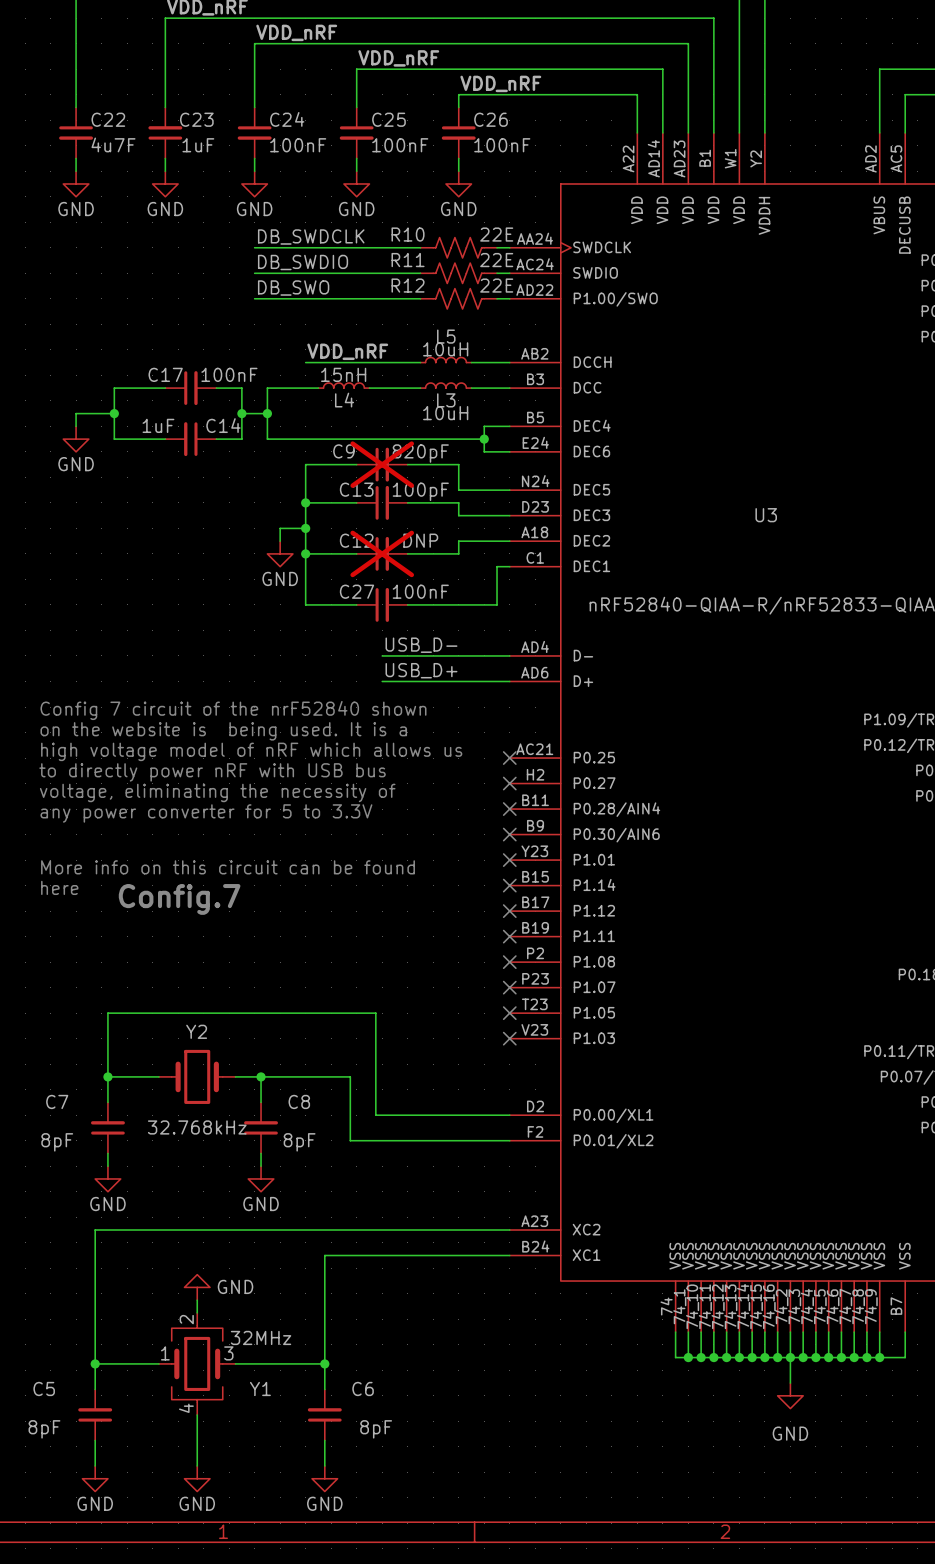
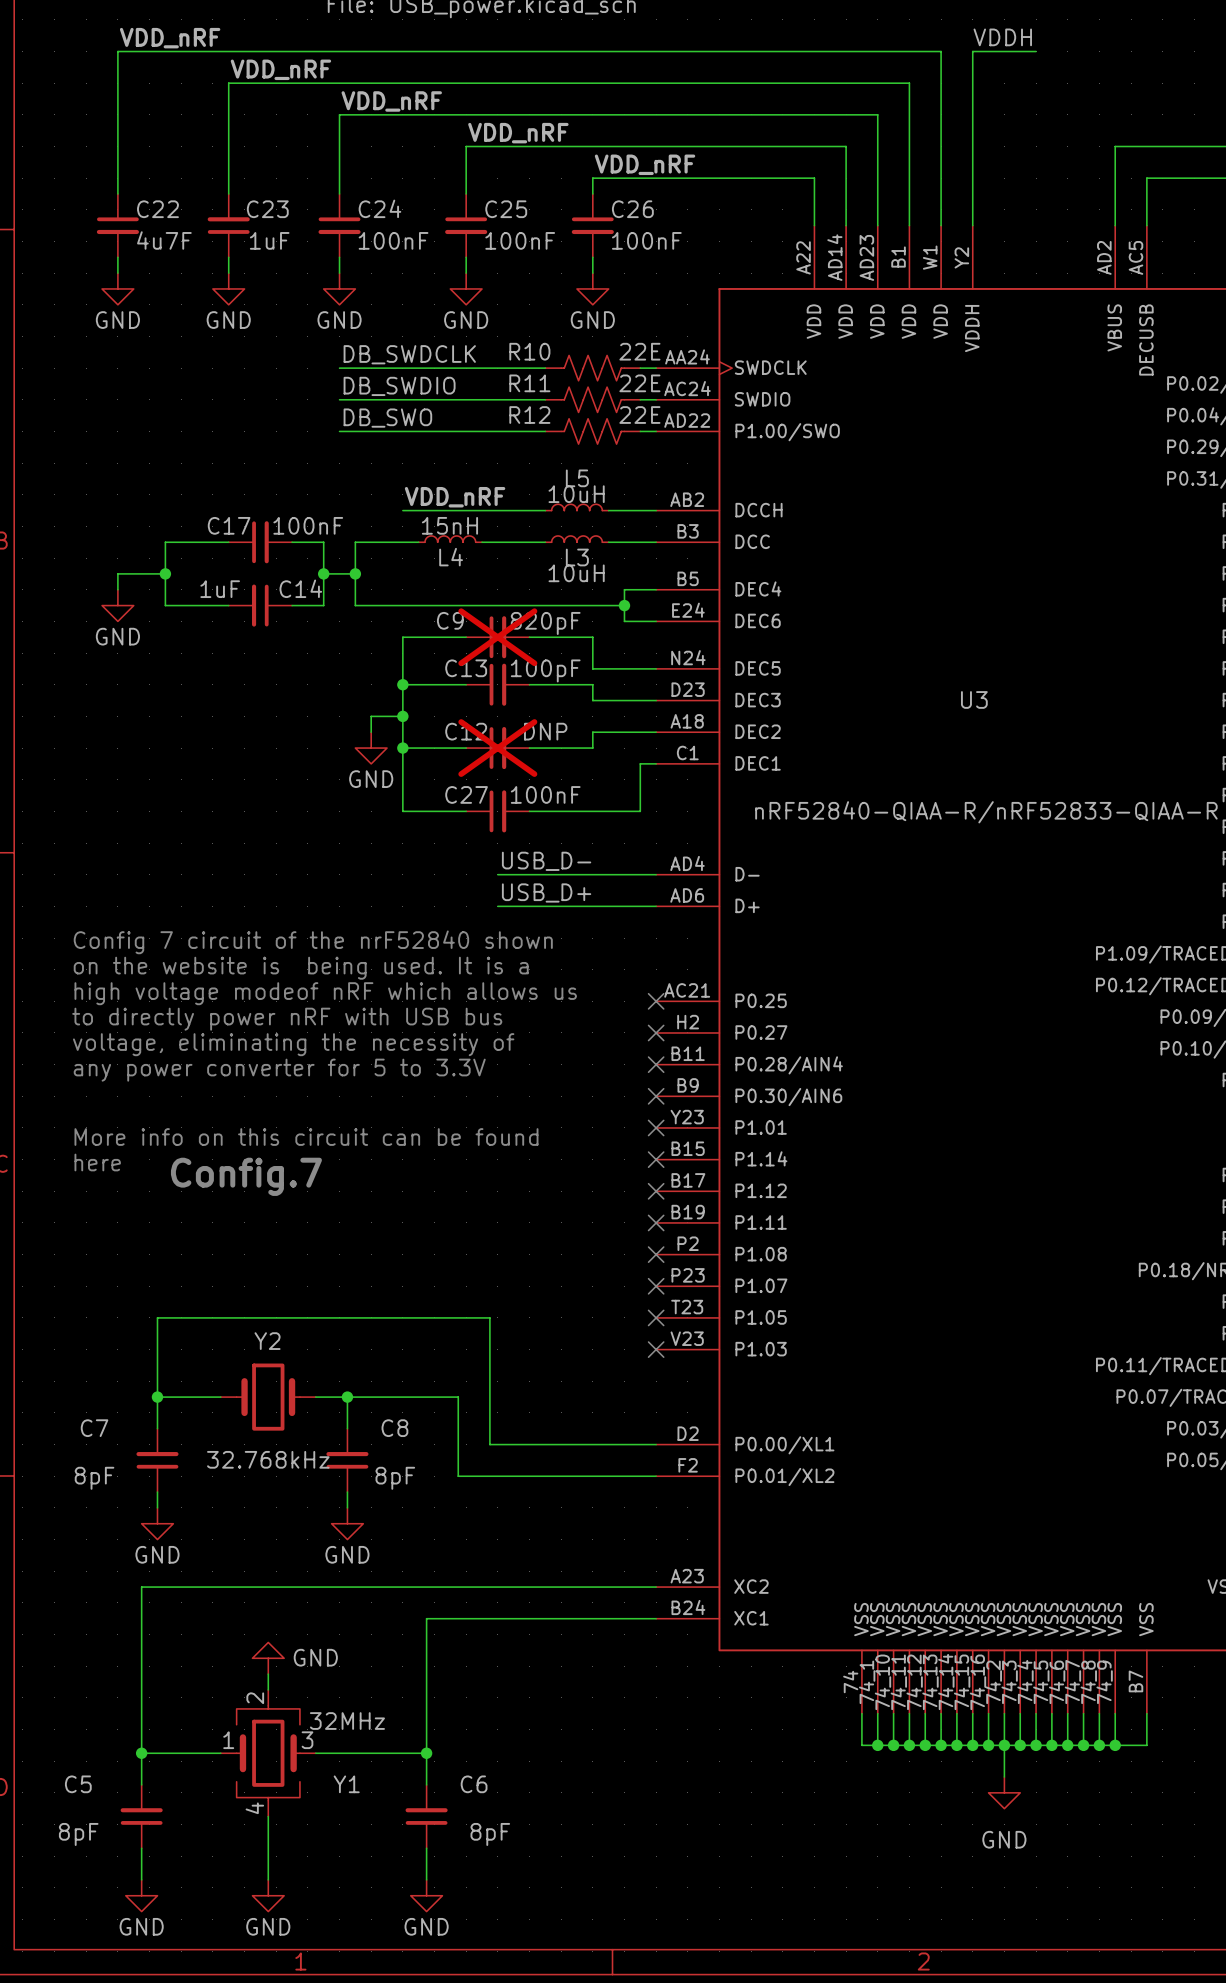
text: high voltage model of nRF which allows us (251, 751) -> high voltage modeof nRF which allows us (325, 993)

